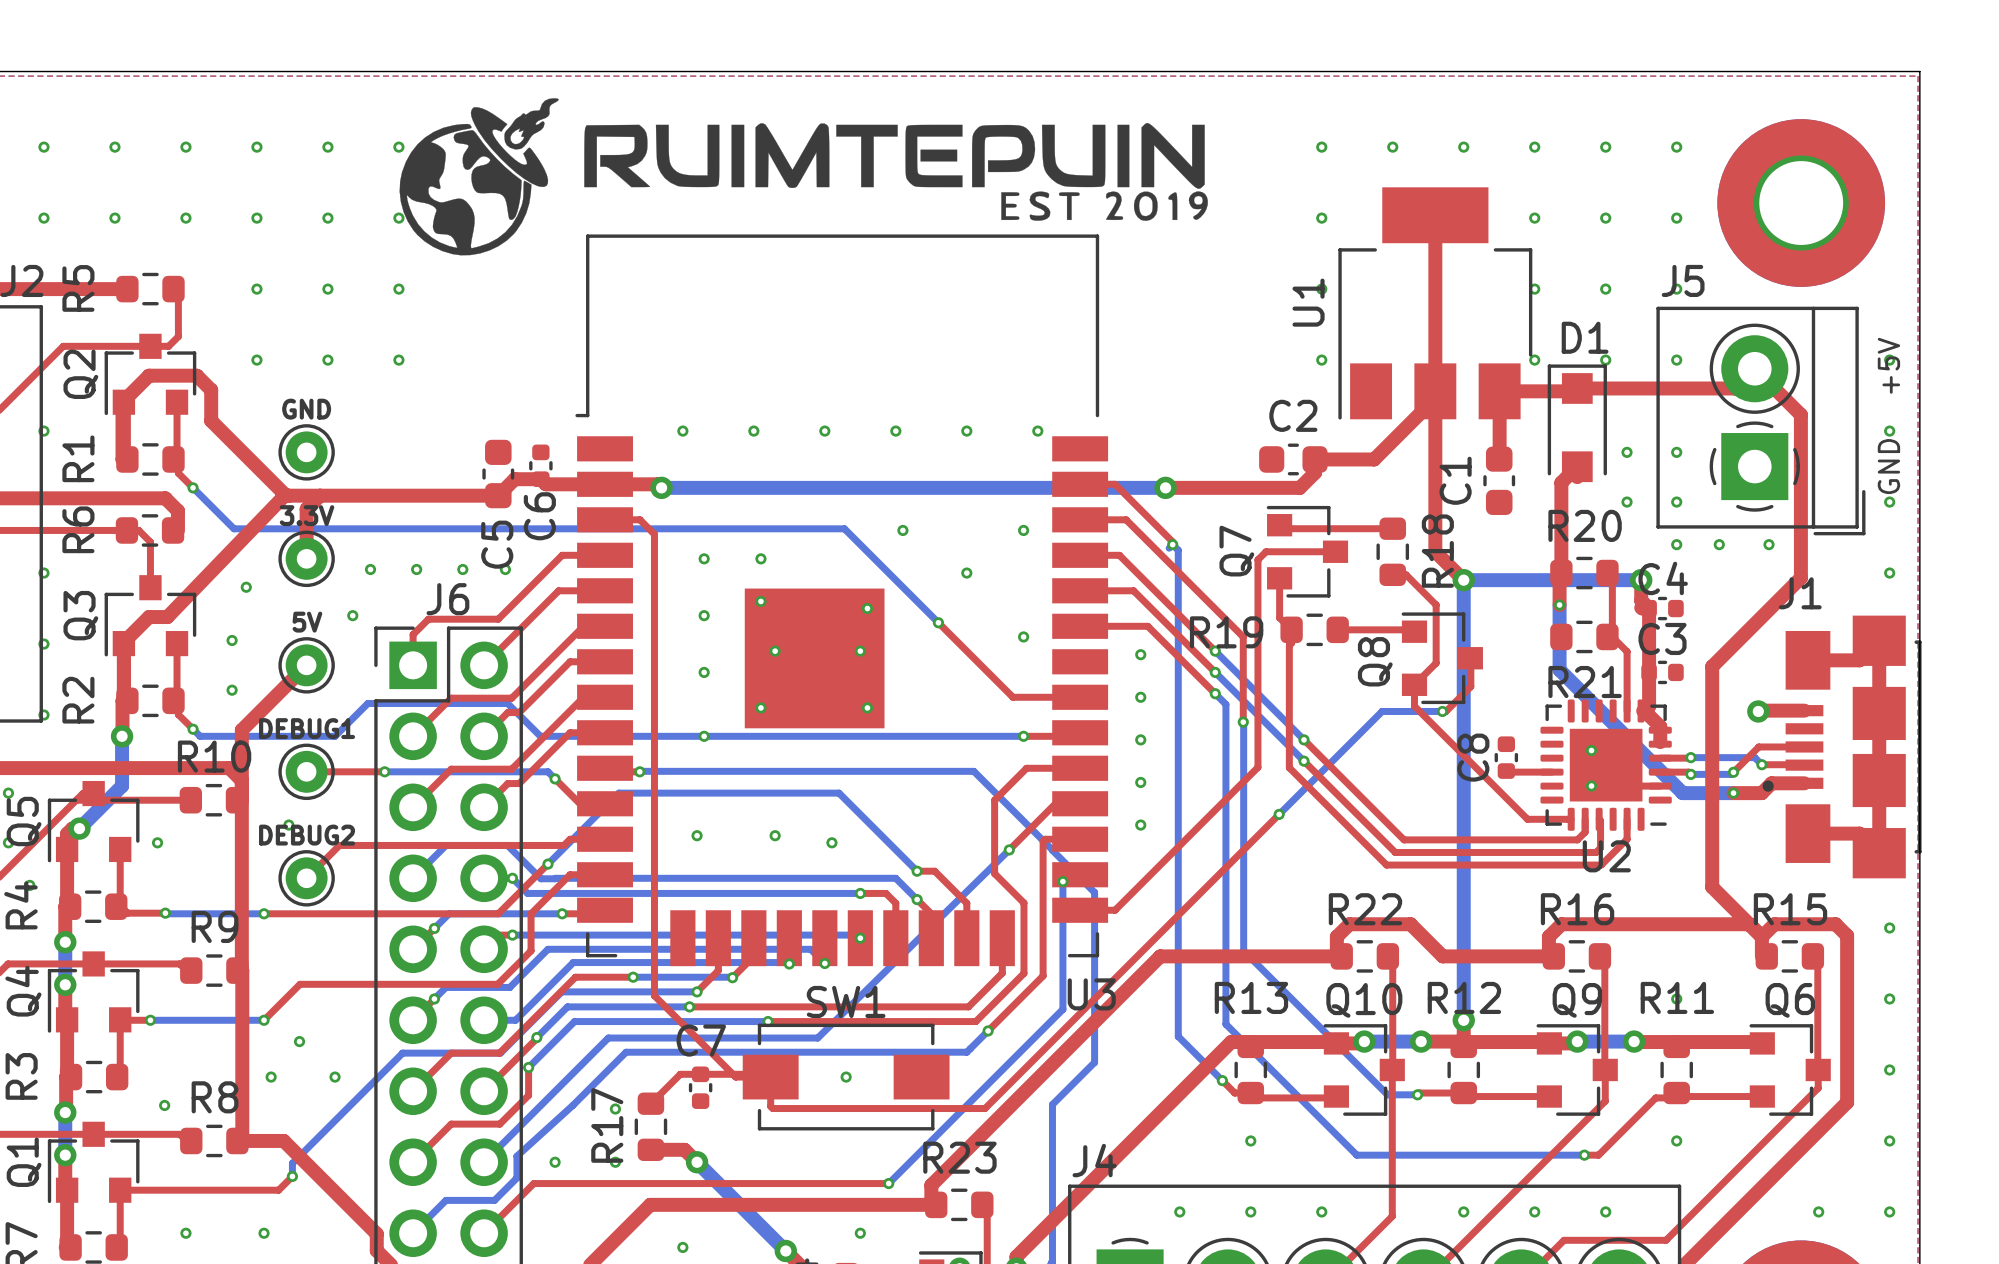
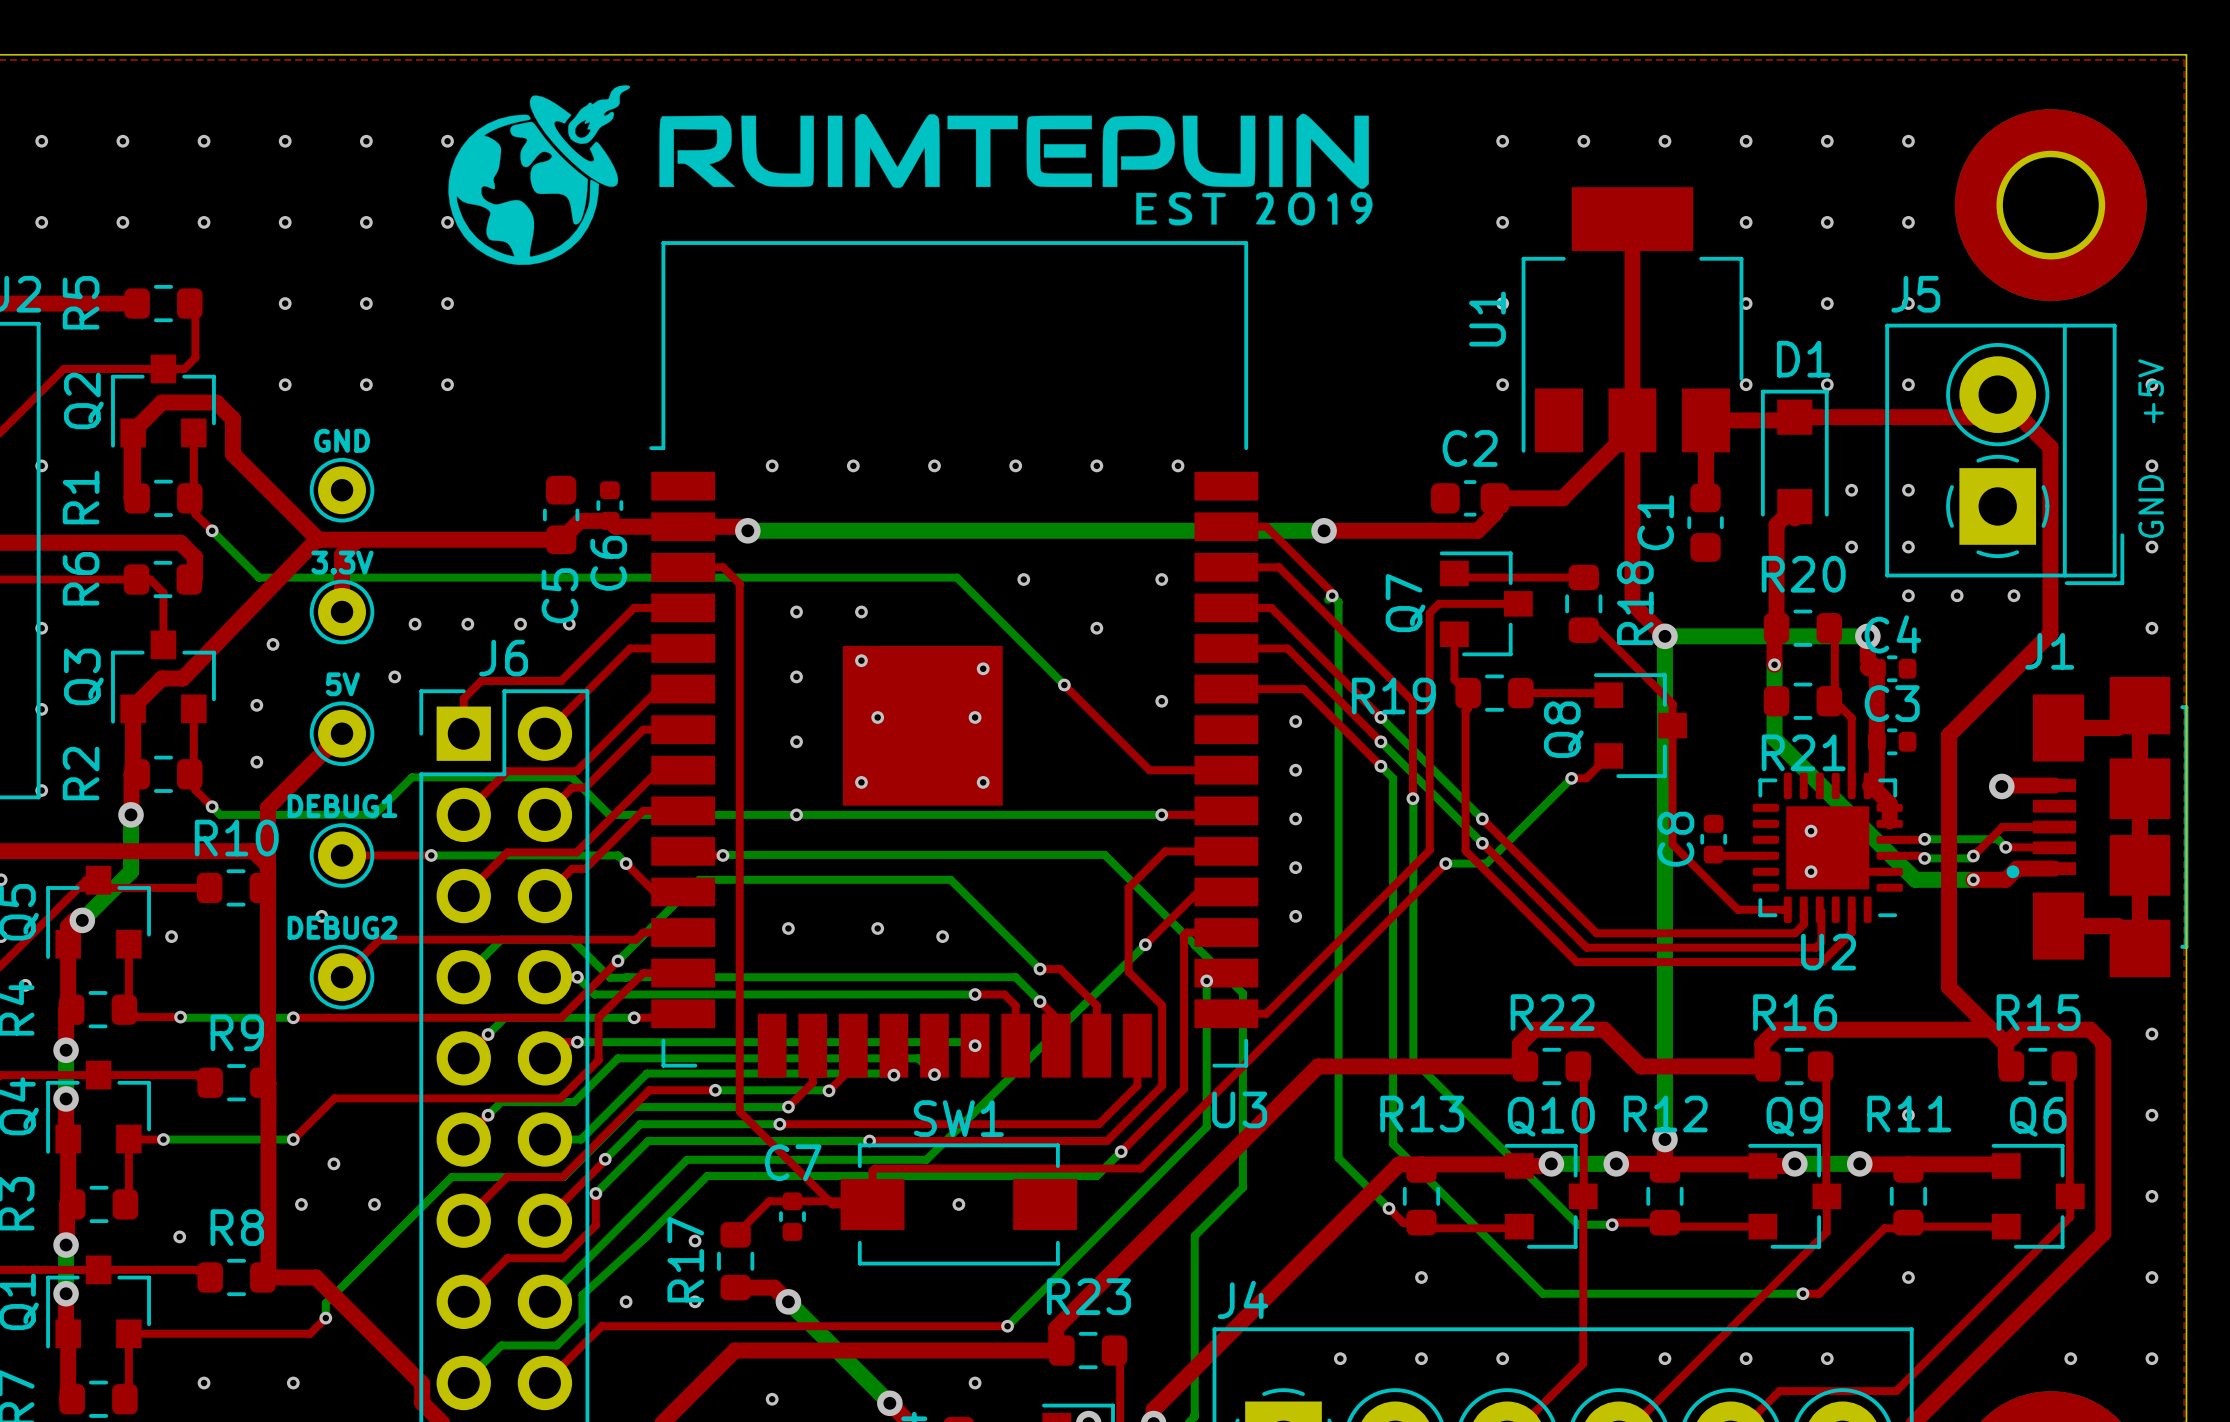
top track: (1436, 604) (1436, 663) (1414, 684) (1414, 706) (1470, 762) -> (1633, 664) (1672, 703) (1672, 844)
top track: (1470, 658) (1470, 686) (1445, 711) (1442, 711) -> none
top track: none -> (1608, 755) (1586, 778) (1571, 778)
bottom track: none -> (1571, 778) (1486, 863) (1445, 863)
bottom track: (1442, 711) (1382, 711) (1279, 814) -> none
via position: (1442, 711) -> (1571, 778)
top track: (1279, 814) (985, 1108) (772, 1108) (770, 1106) (770, 1077) -> (1445, 863) (1140, 1168) (874, 1168) (872, 1170) (872, 1204)
via position: (1279, 814) -> (1445, 863)

